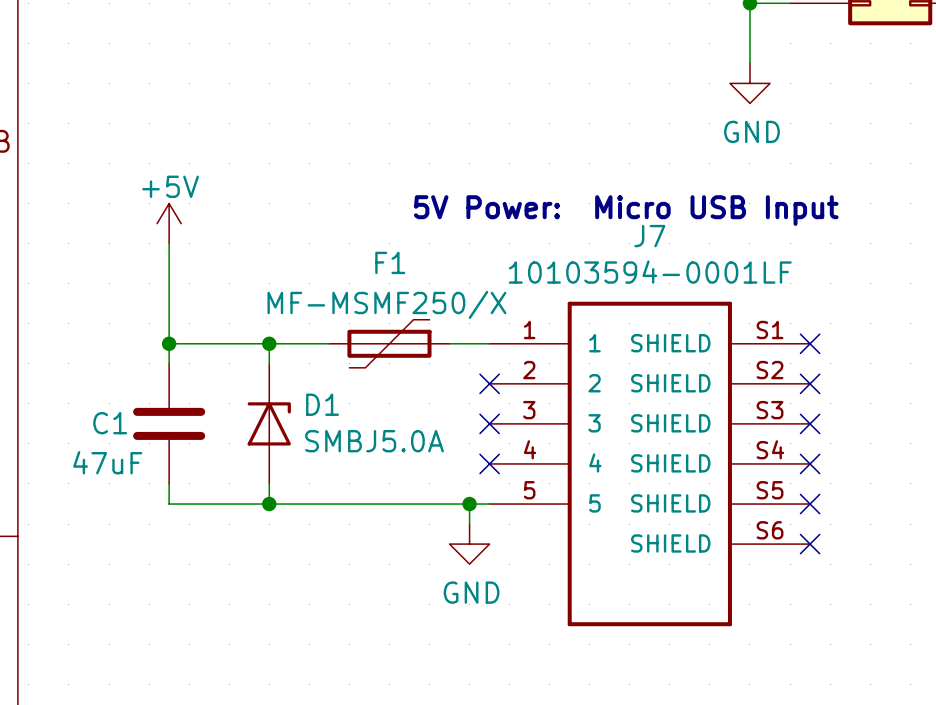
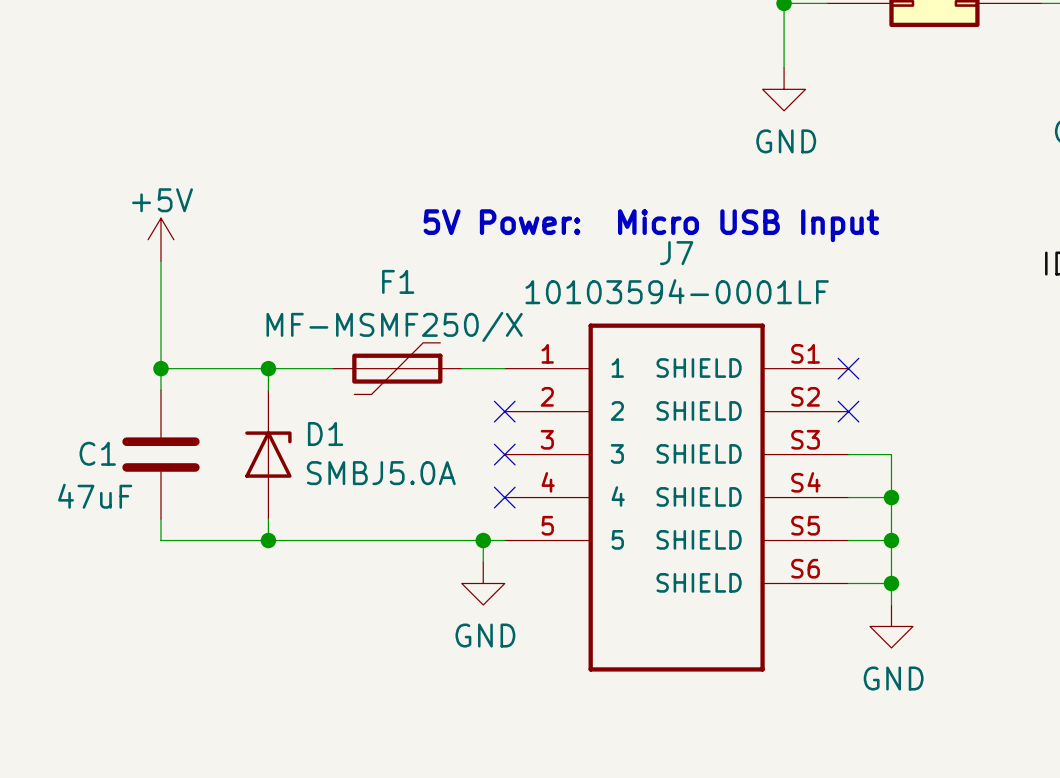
wire: none -> (848, 454) (891, 454) (891, 604)
no-connect mark: (810, 423) -> none
wire: none -> (848, 497) (891, 497)
no-connect mark: (810, 463) -> none
junction: none -> (891, 497)
wire: none -> (848, 540) (891, 540)
no-connect mark: (810, 504) -> none
junction: none -> (891, 540)
wire: none -> (848, 583) (891, 583)
no-connect mark: (810, 544) -> none
junction: none -> (891, 583)
power symbol: none -> GND (891, 626)

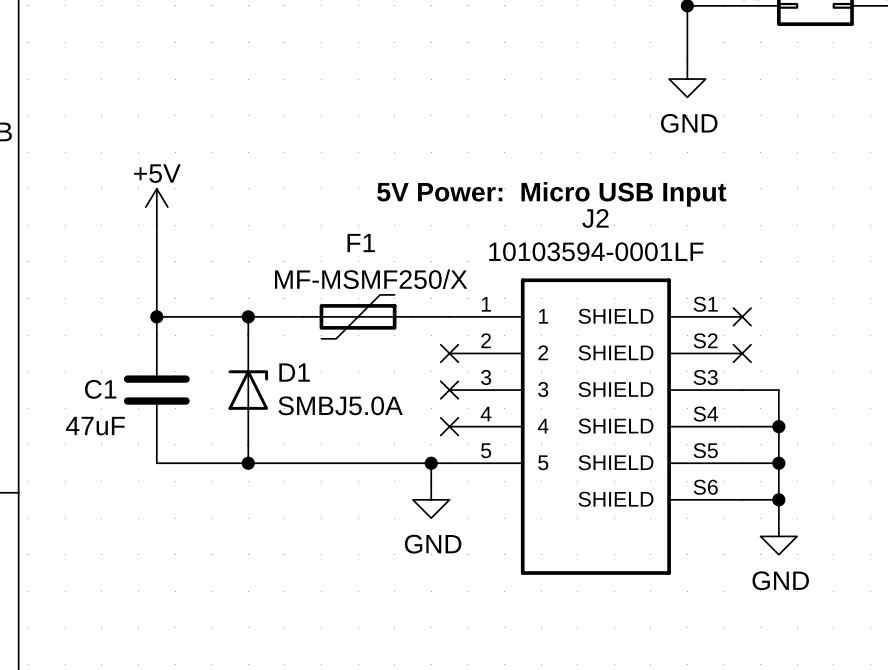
J7 name: J7 (676, 253) -> J2 (595, 218)

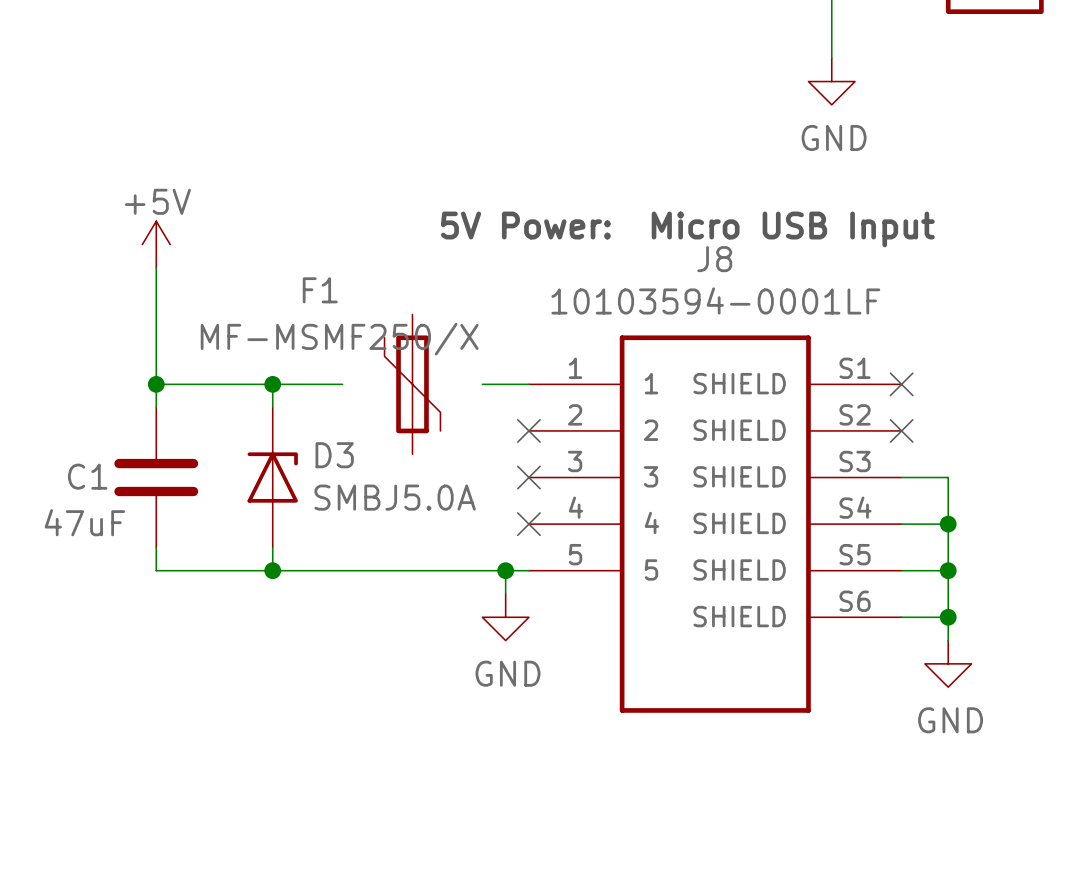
J2 name: J2 (595, 218) -> J8 (714, 259)
F1 name position: F1 (361, 243) -> F1 (320, 290)
F1 value position: MF-MSMF250/X (371, 279) -> MF-MSMF250/X (339, 339)
F1 rotation: 0° (358, 316) -> 90° clockwise (412, 384)
D1 name: D1 (294, 372) -> D3 (334, 455)

